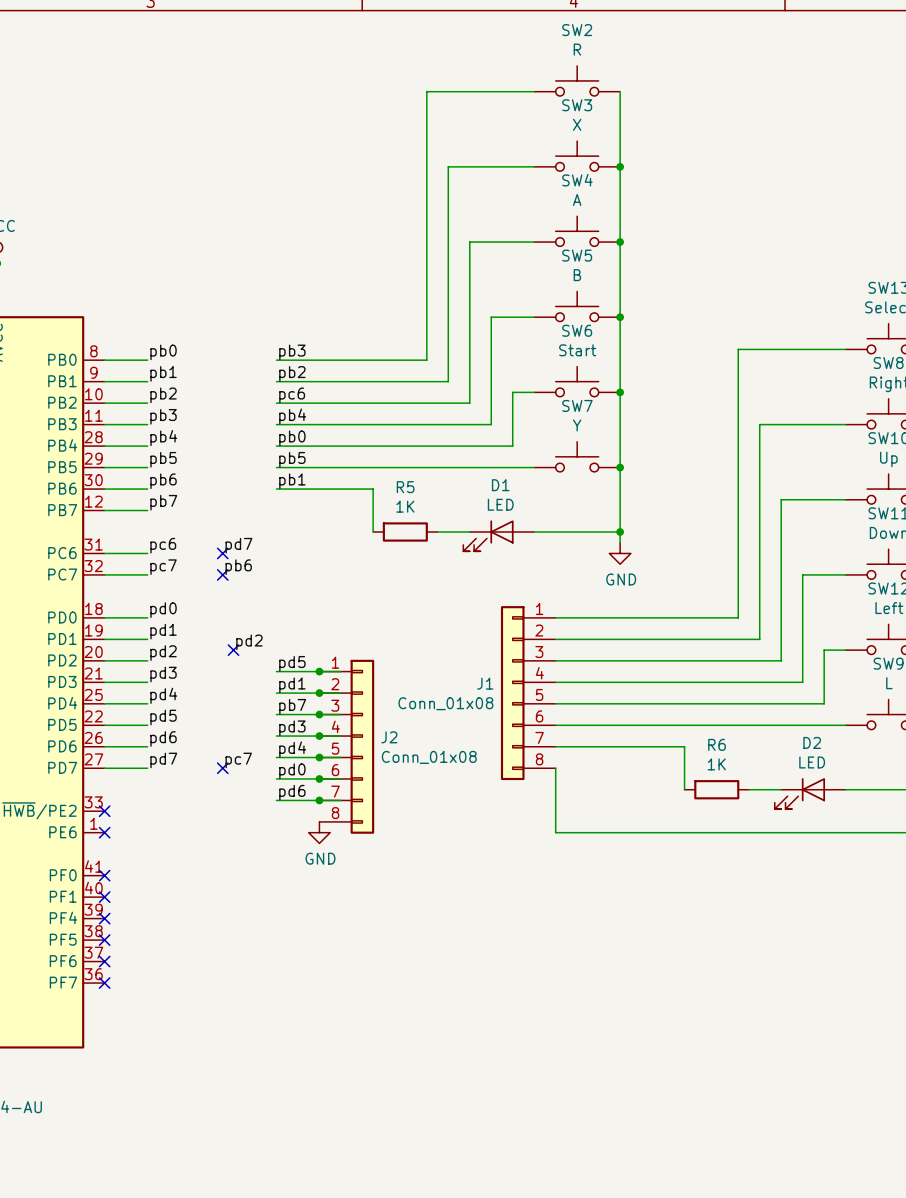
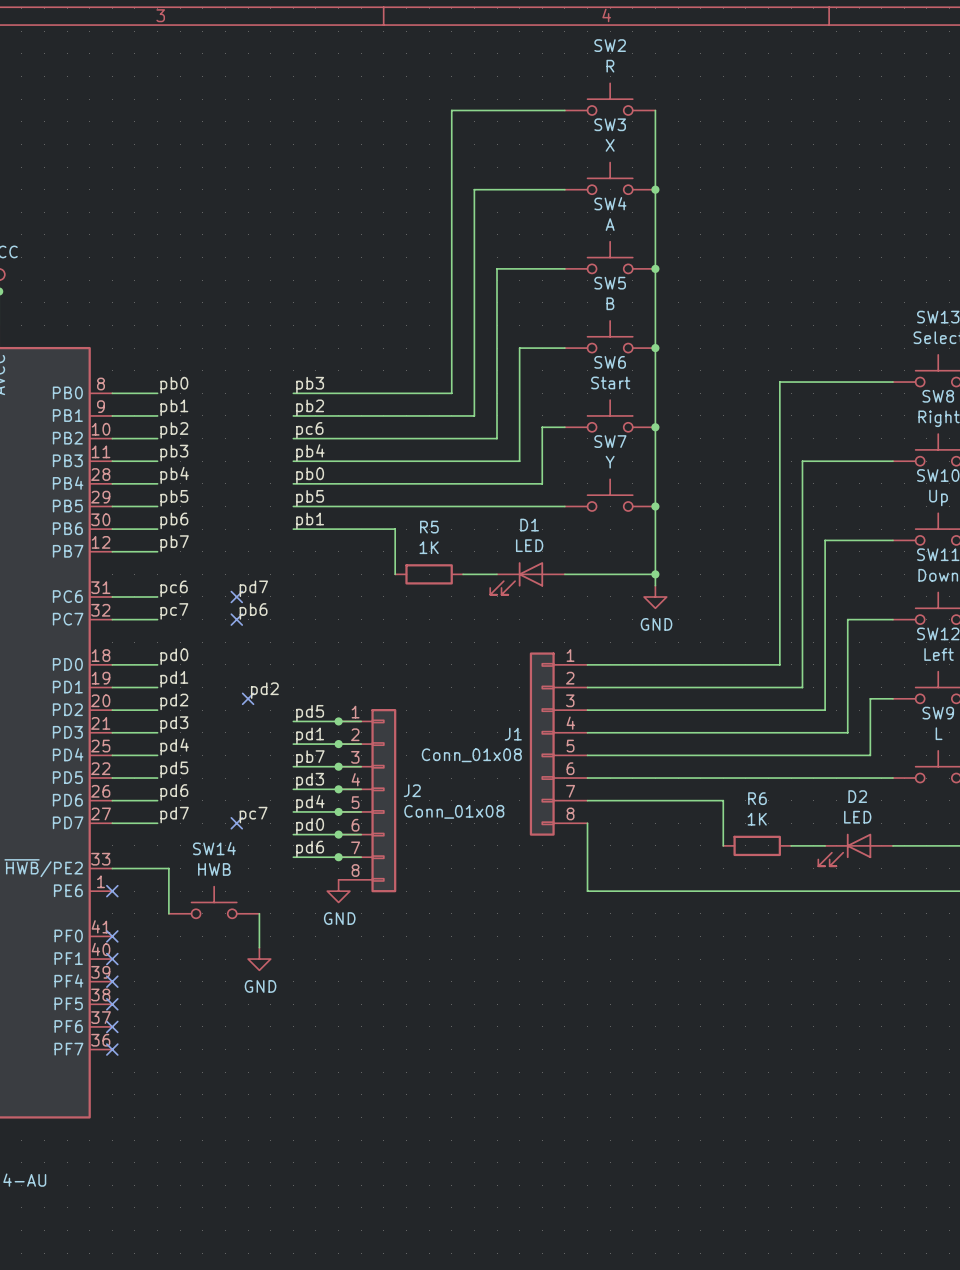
wire: none -> (112, 868) (168, 868) (168, 913)
no-connect mark: (104, 811) -> none
SW14: none -> HWB (214, 902)
wire: none -> (259, 913) (259, 947)
power symbol: none -> GND (259, 959)

